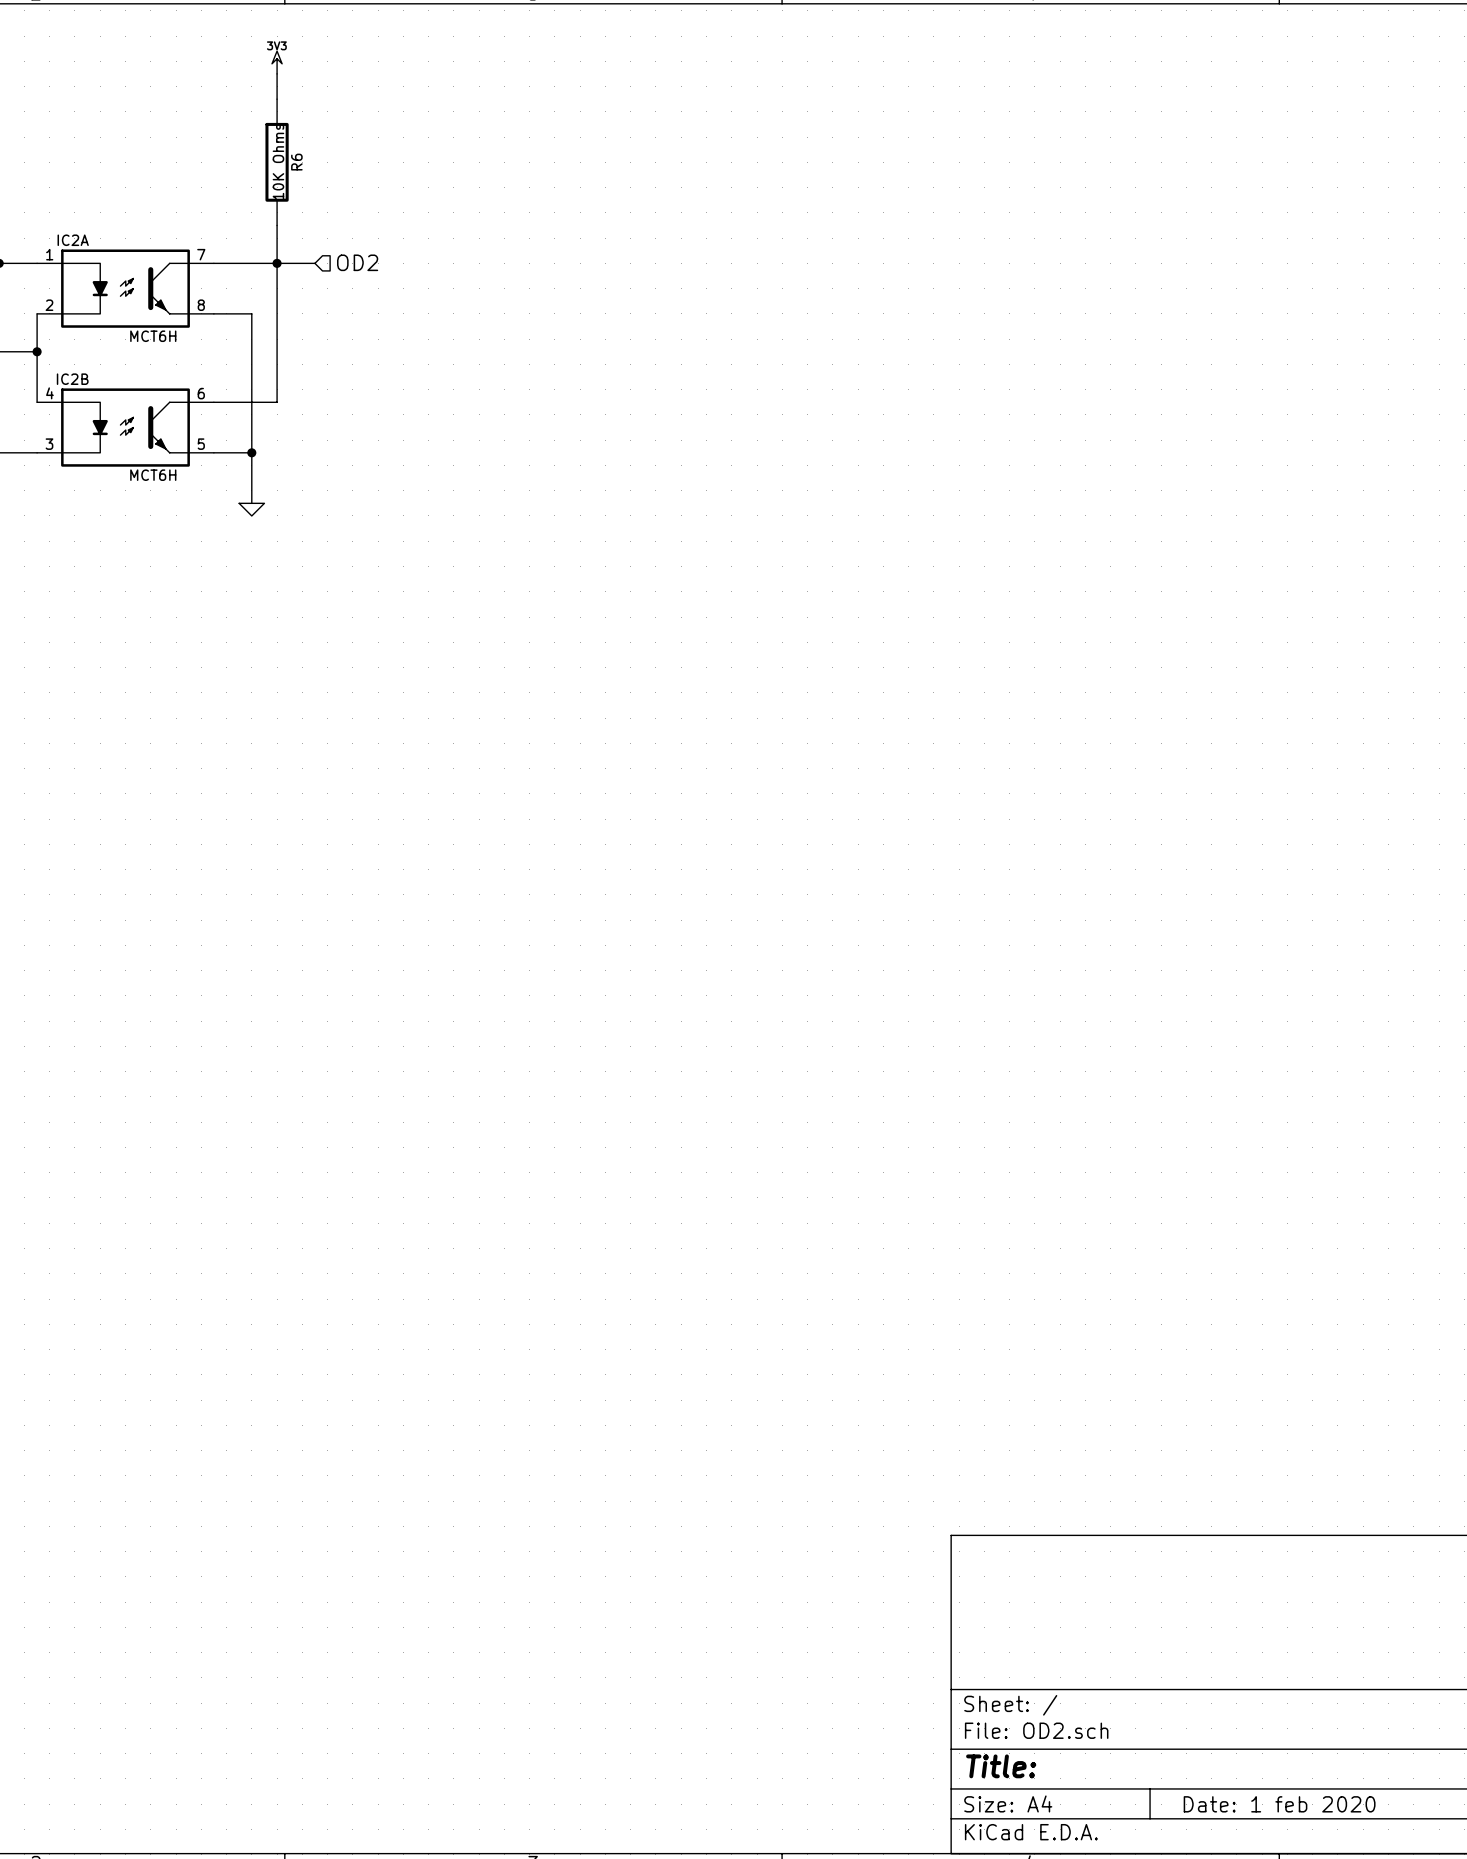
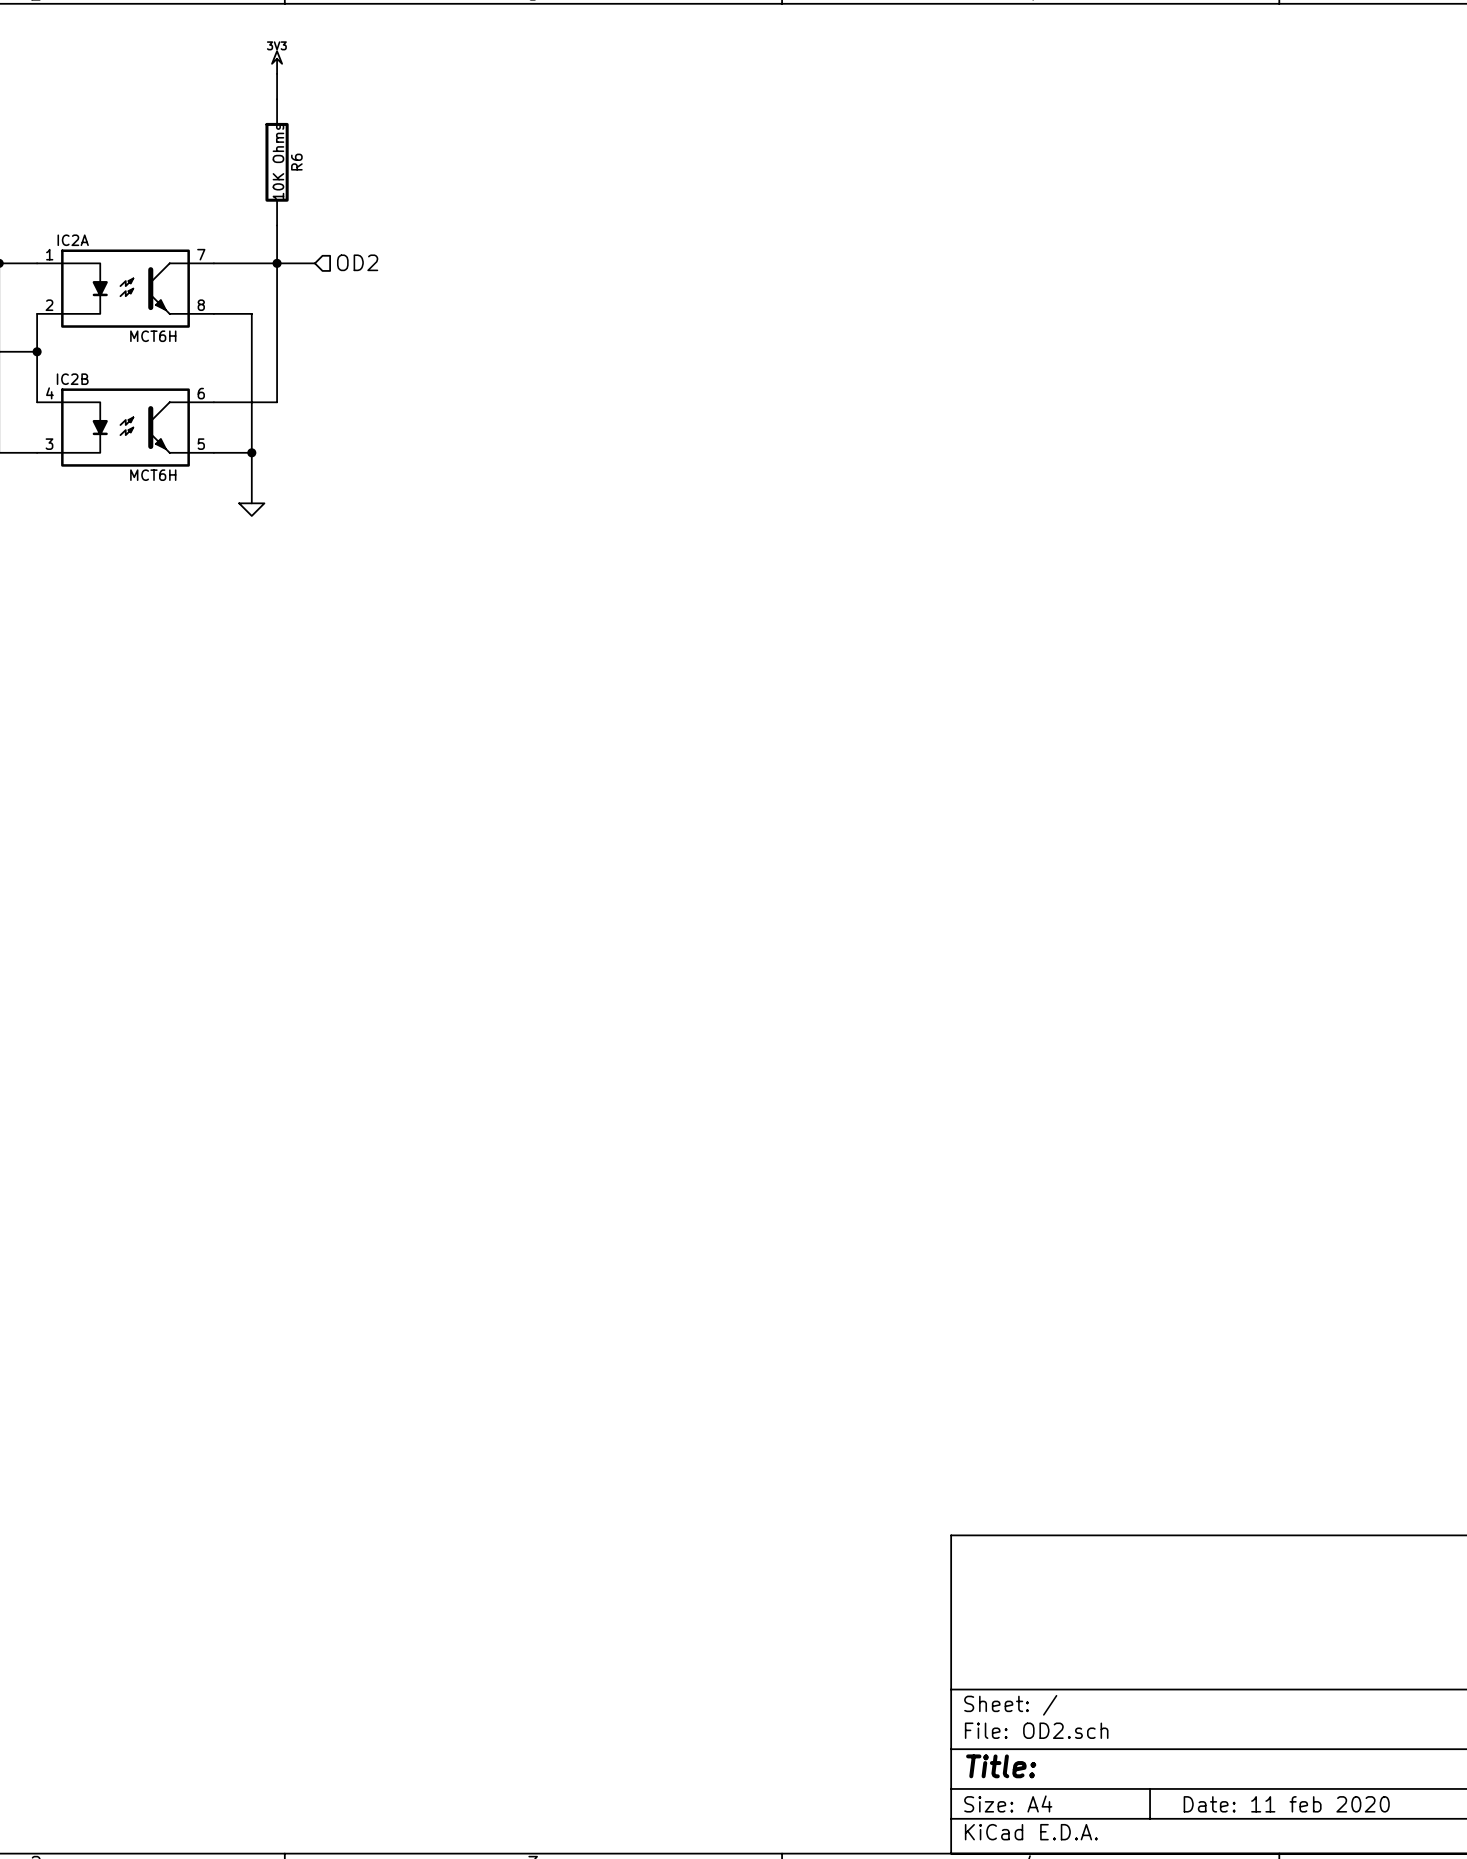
title block: Date: 1 feb 2020 (1279, 1804) -> Date: 11 feb 2020 (1286, 1804)

